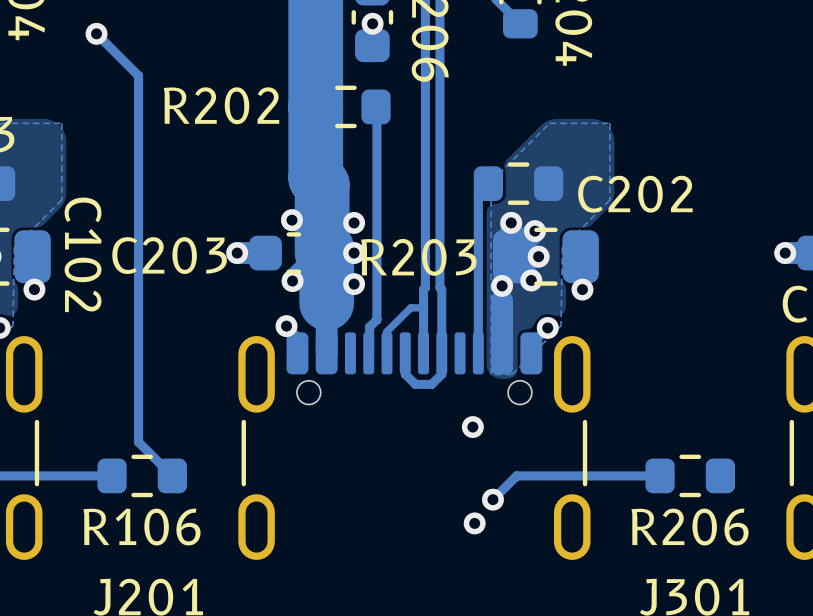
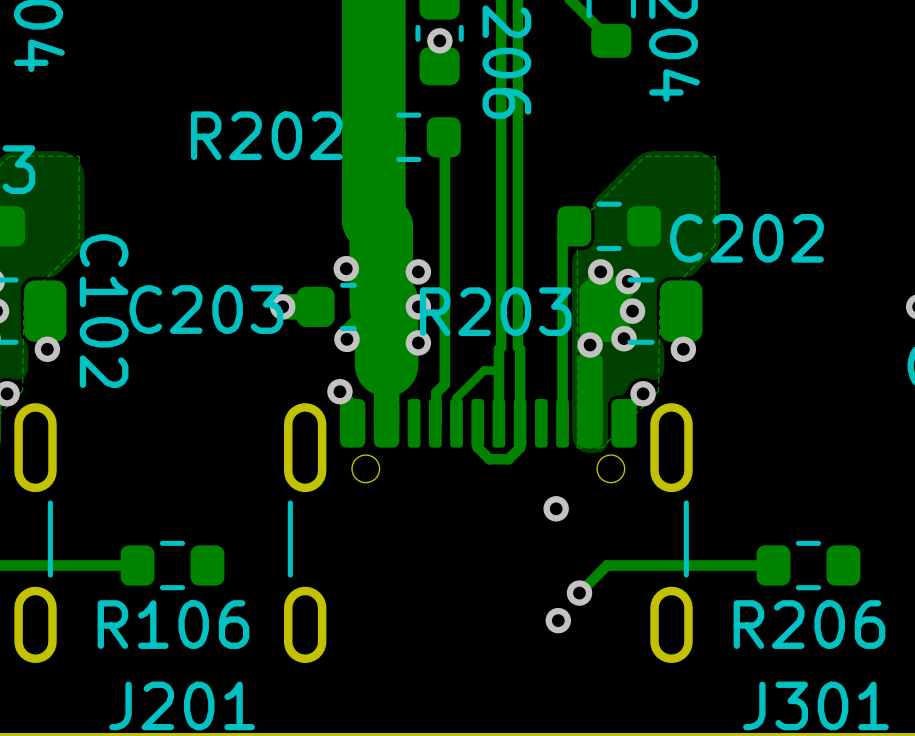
track: (96, 33) (138, 75) (138, 442) (172, 475) -> none
via: (96, 33) -> none

